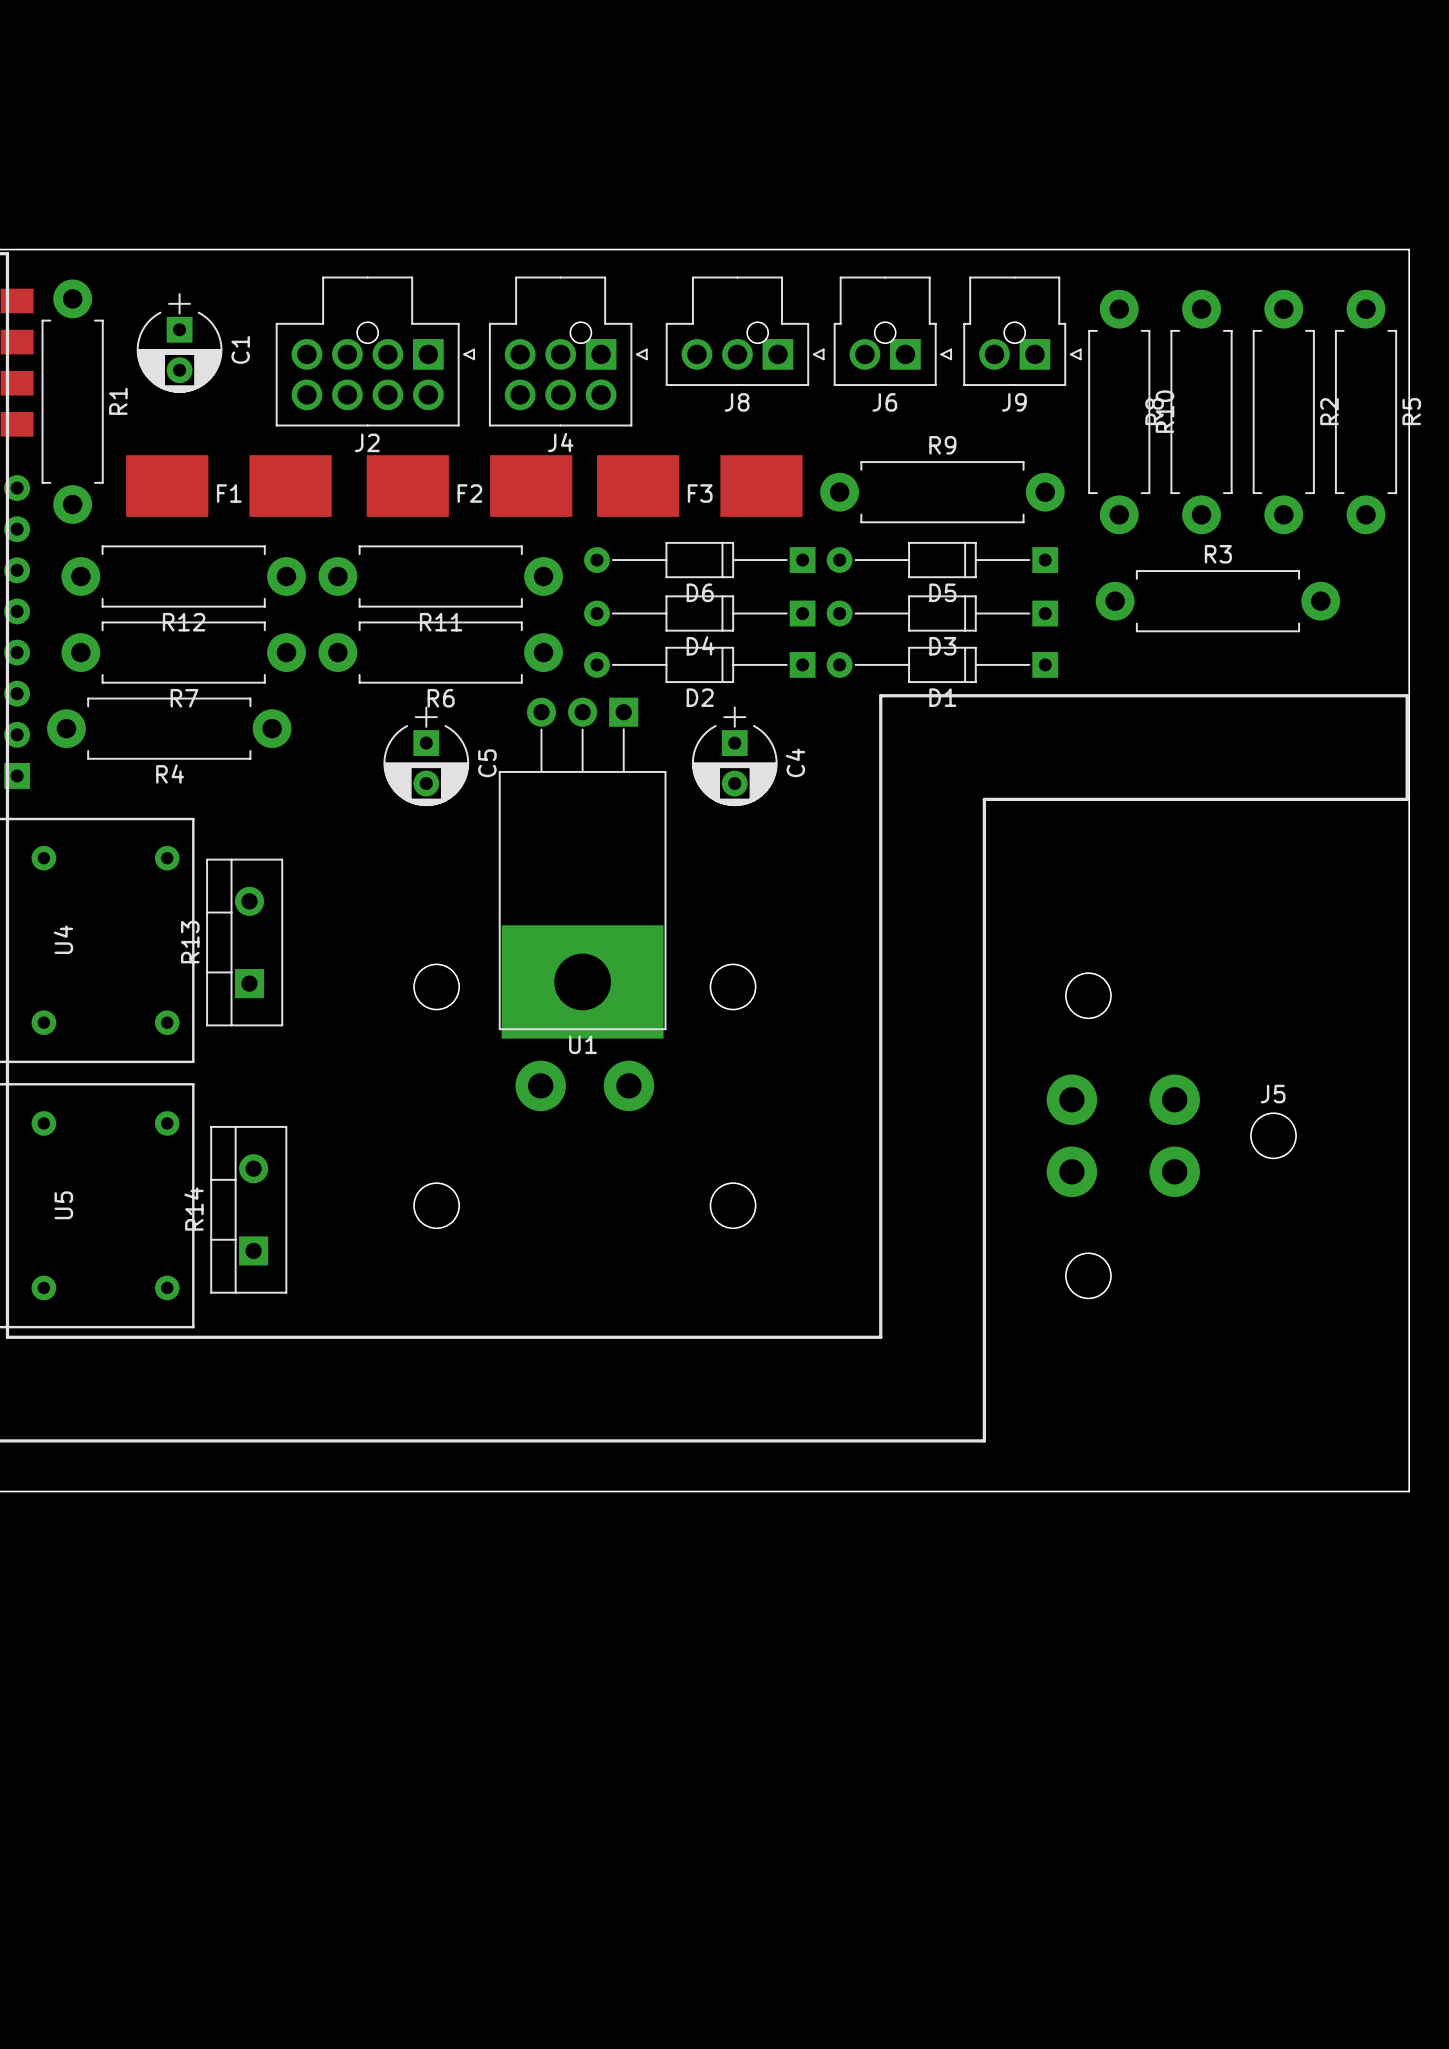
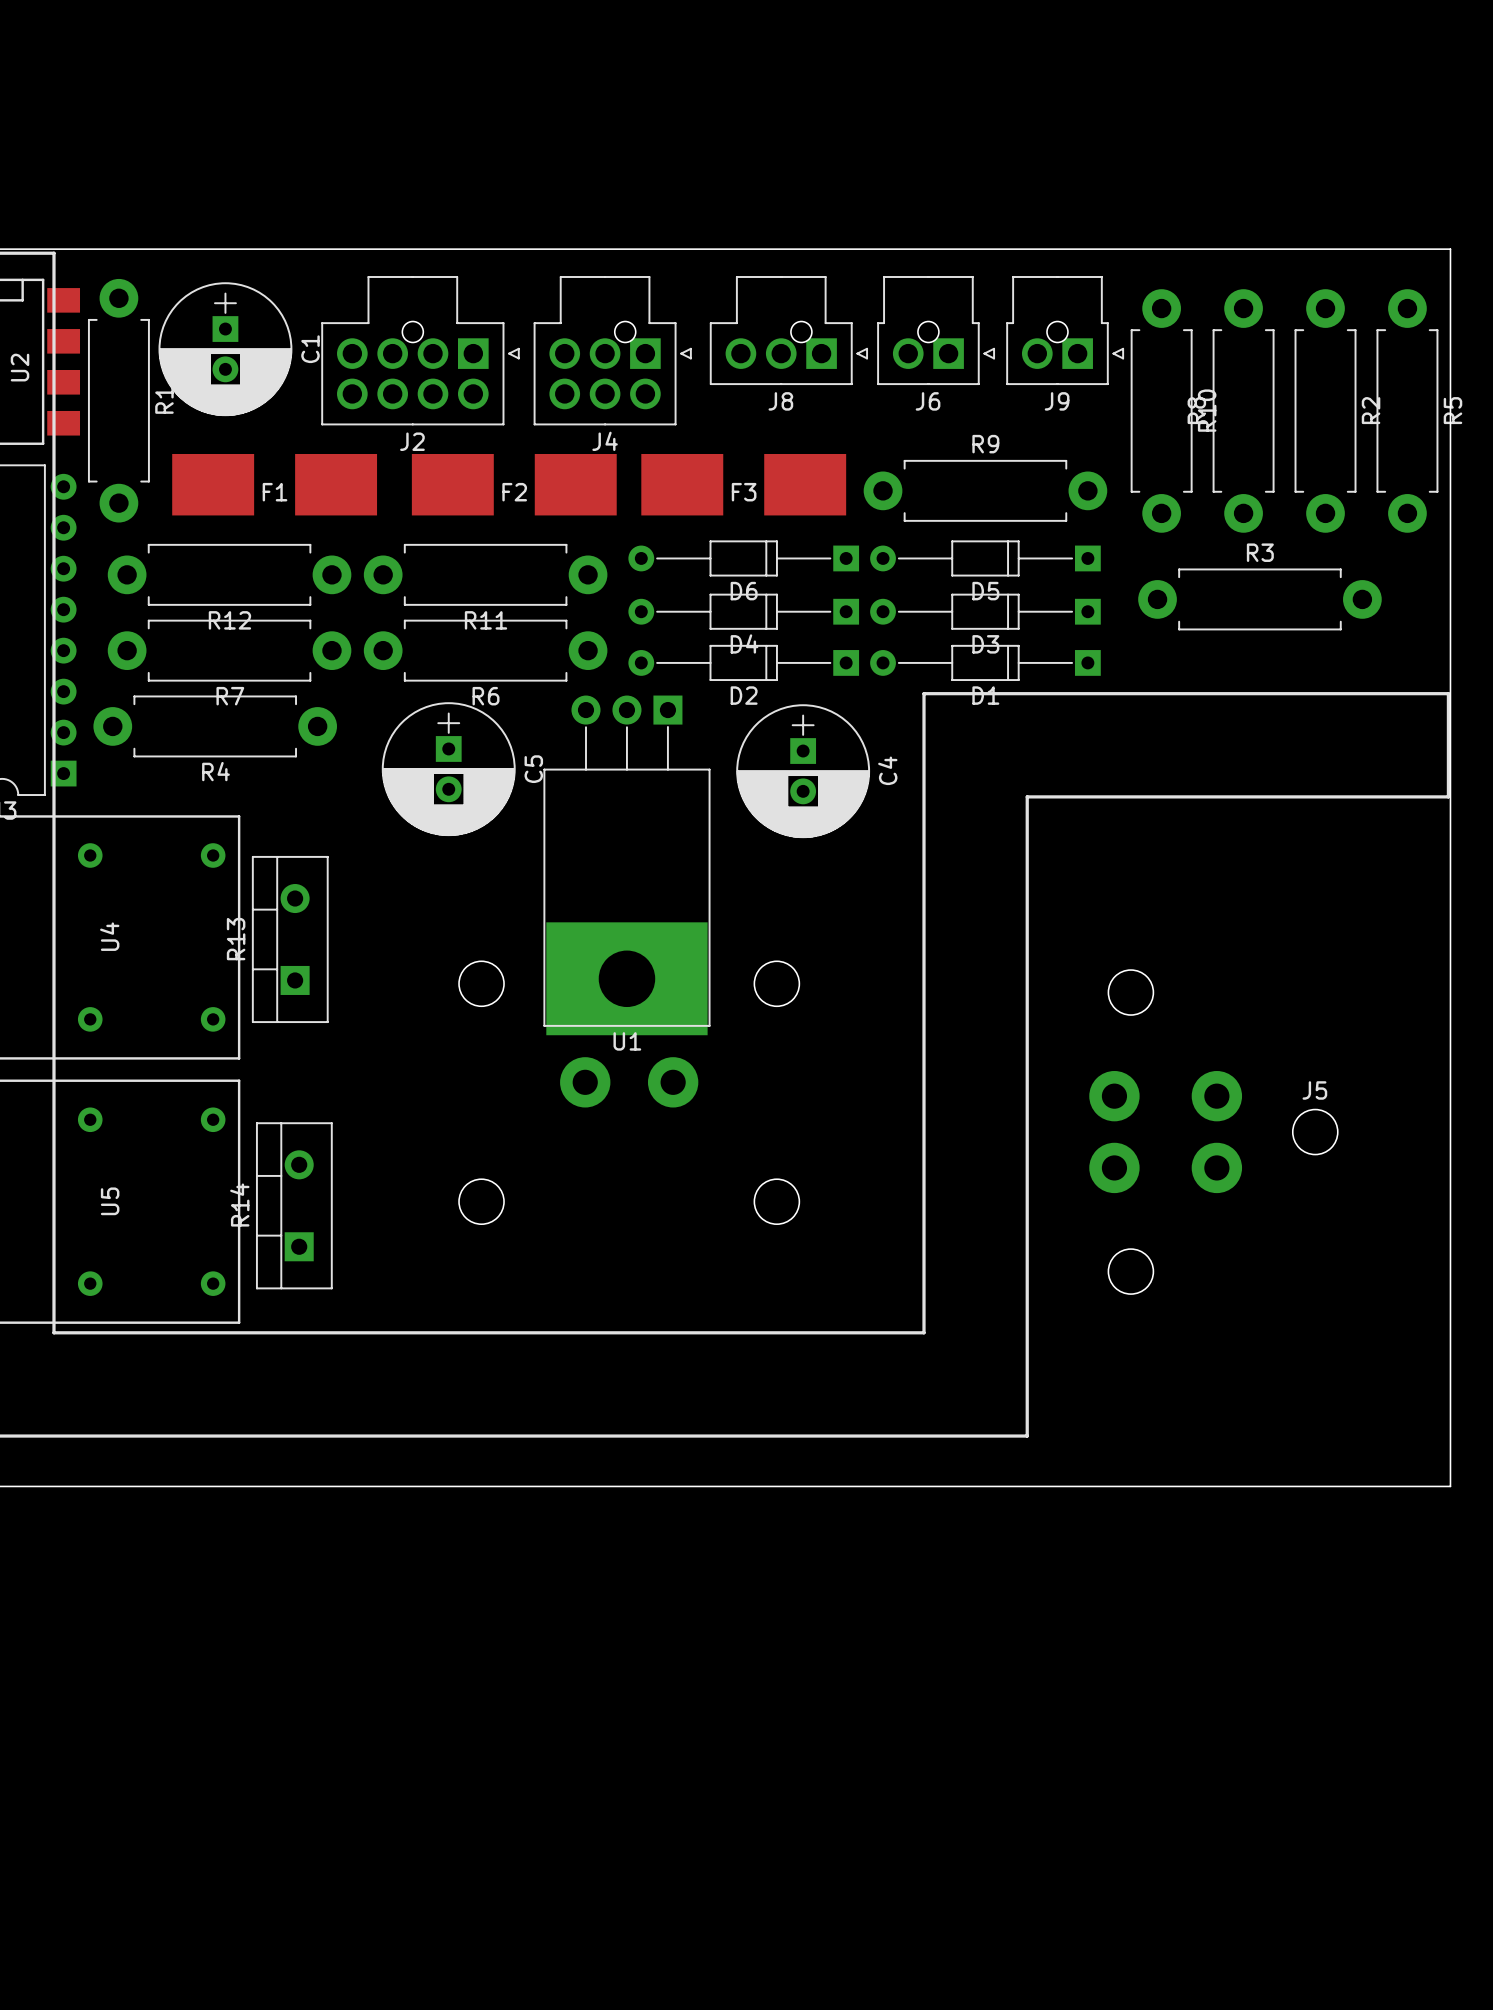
C1 footprint: [136, 293, 223, 393] -> [158, 282, 293, 417]
C5 footprint: [383, 706, 470, 807] -> [381, 702, 516, 837]
C4 footprint: [691, 706, 778, 807] -> [736, 704, 871, 839]

